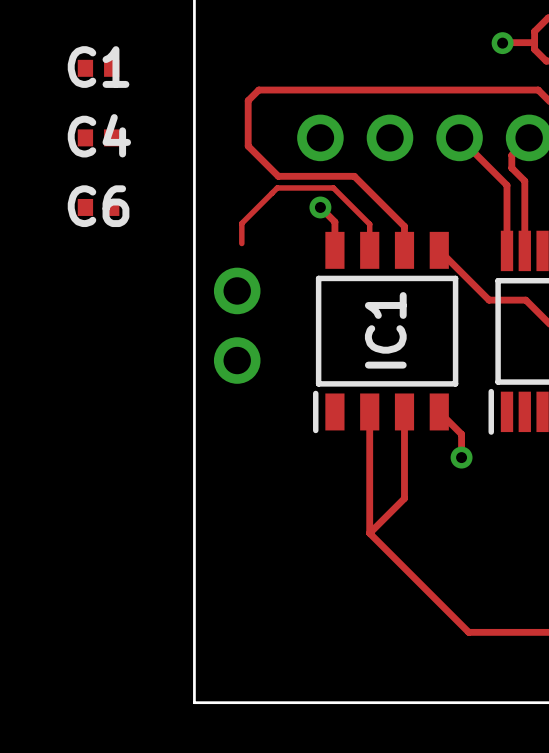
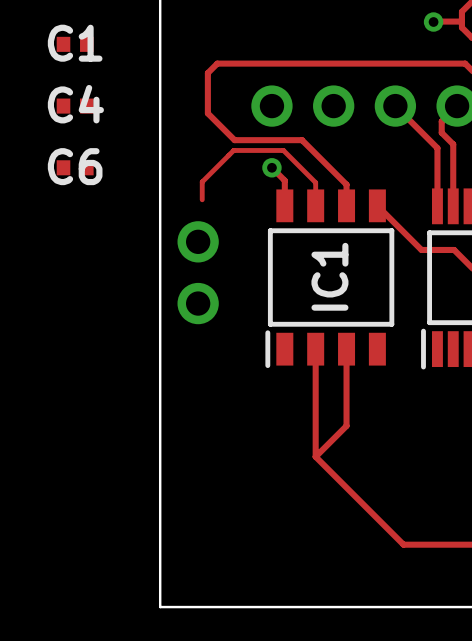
track: (439, 411) (461, 434) (461, 457) -> none
via: (461, 457) -> none

